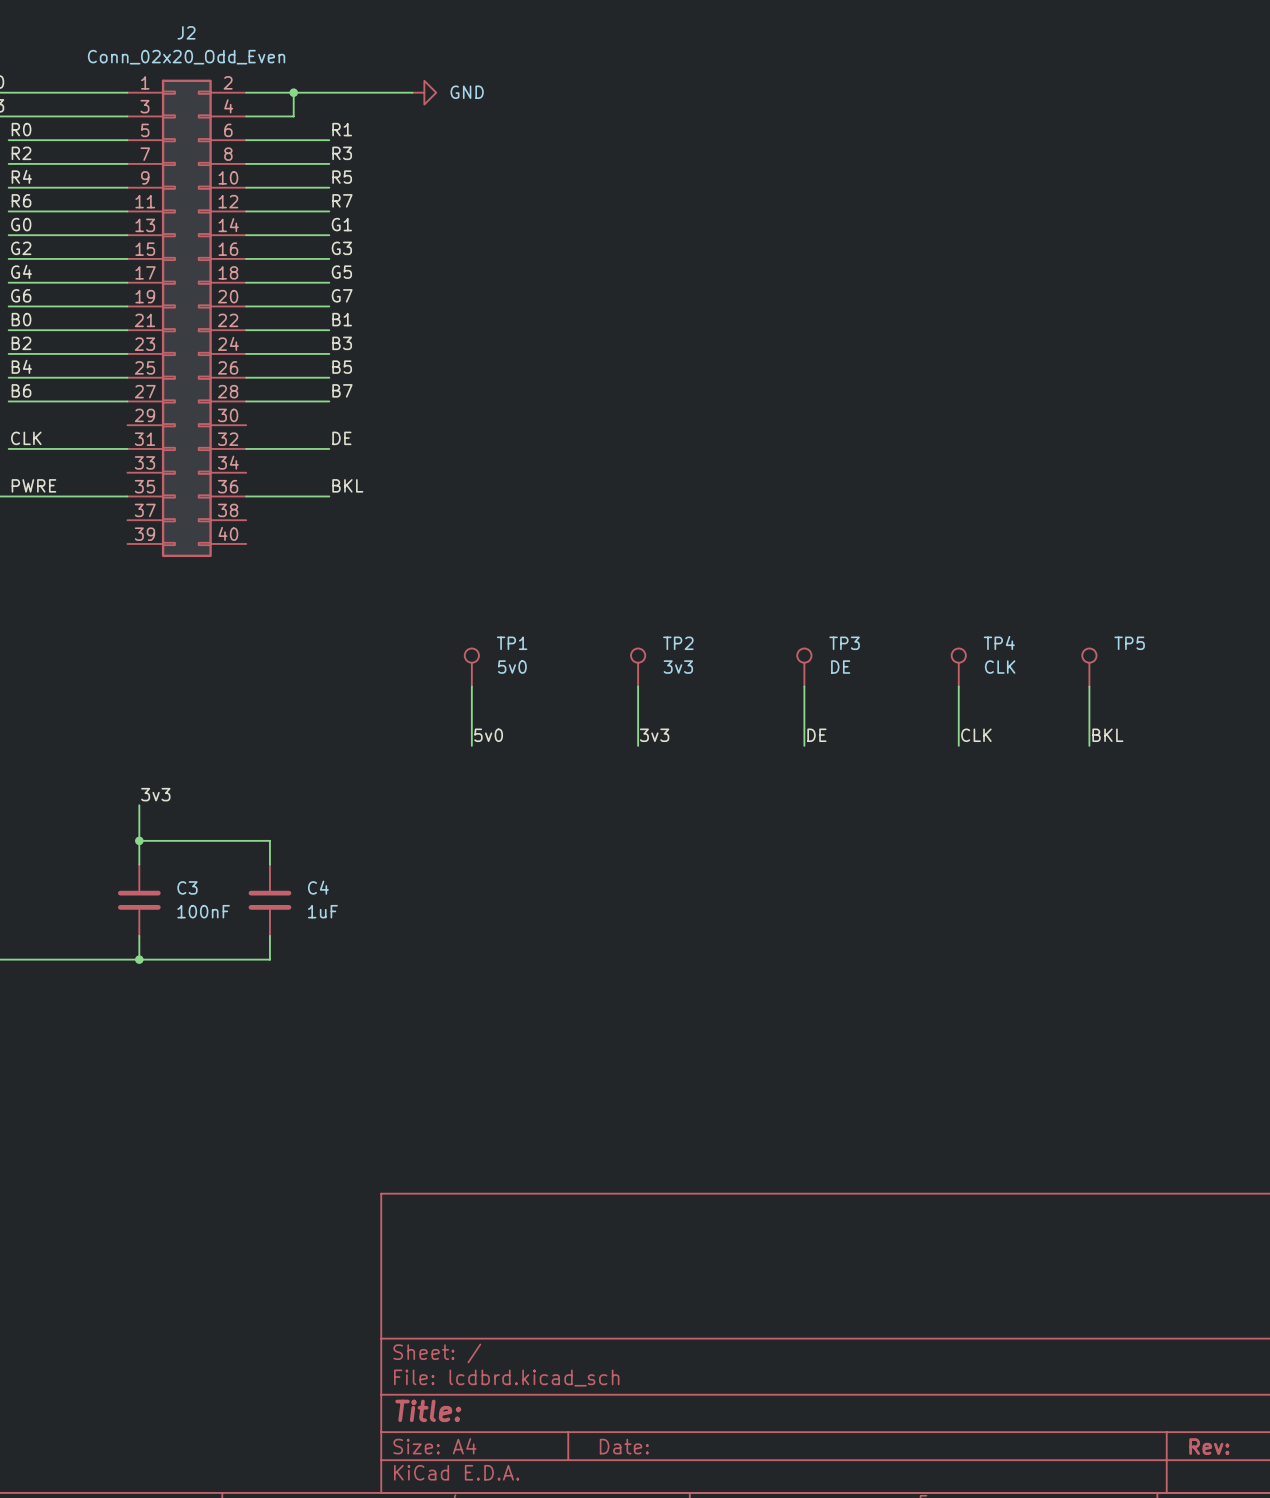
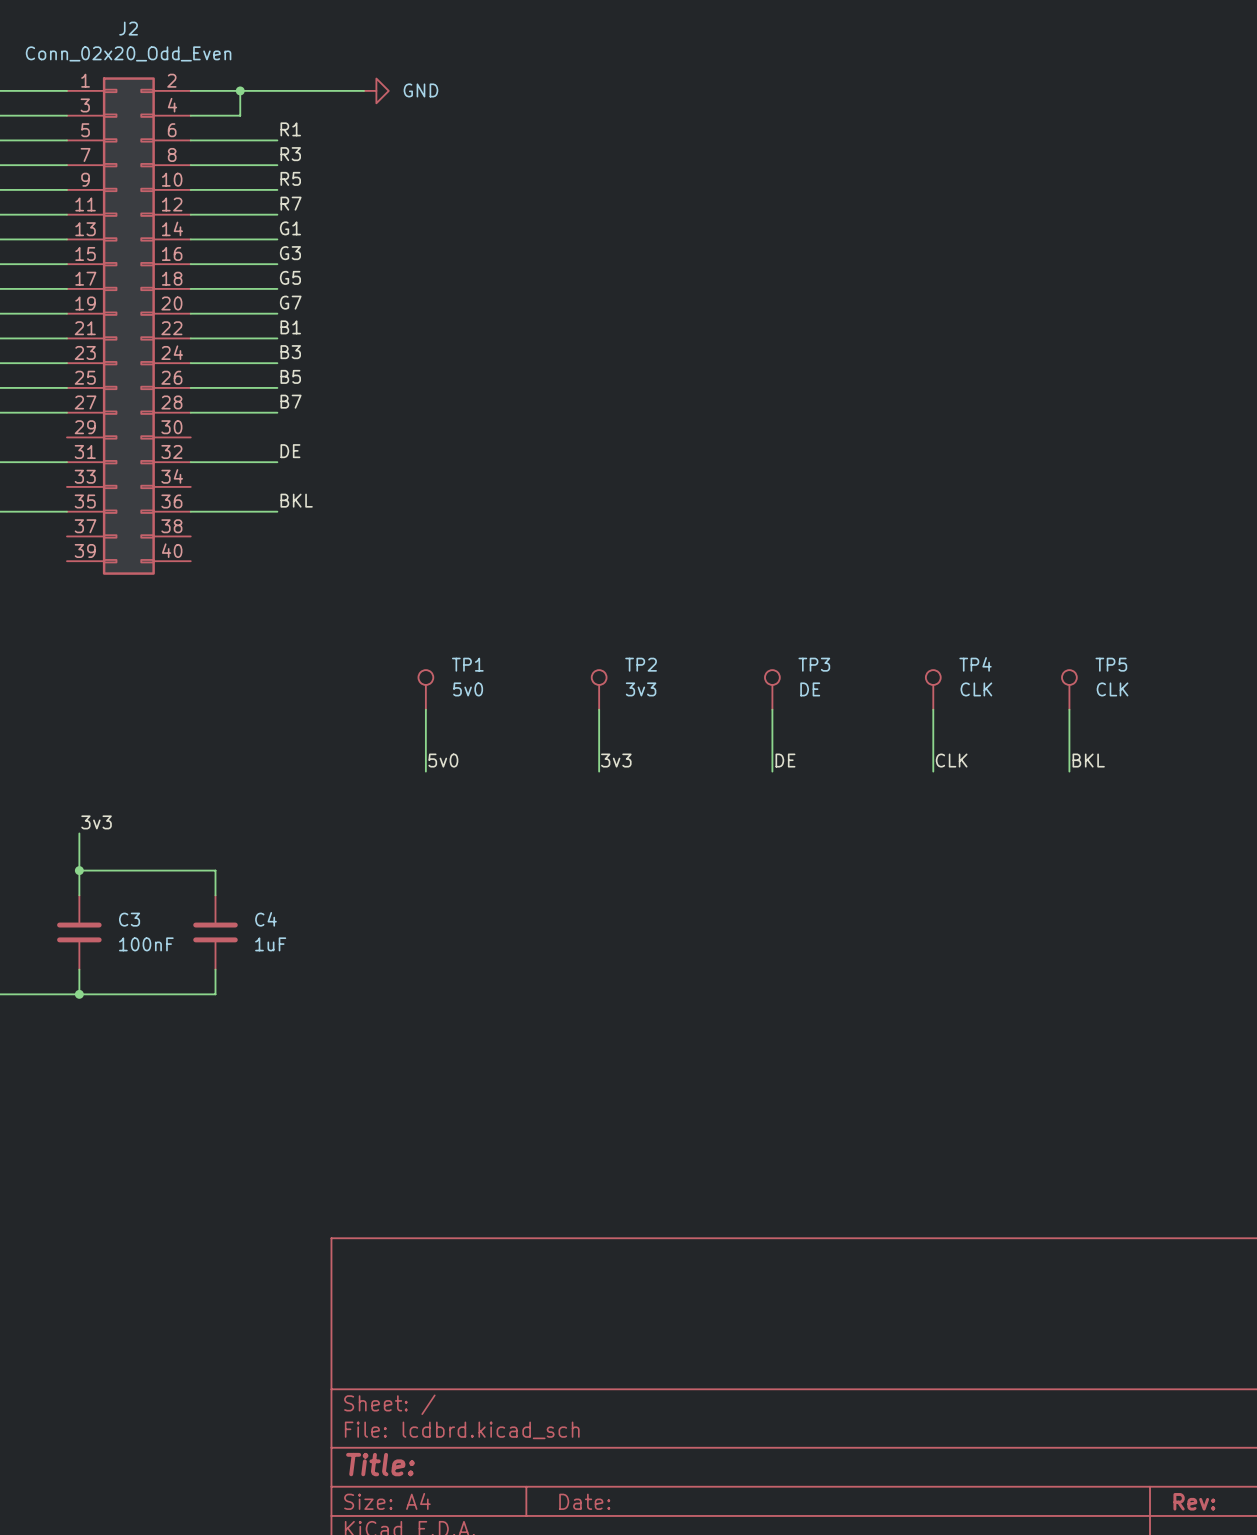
TP5 value: none -> CLK (1112, 689)

